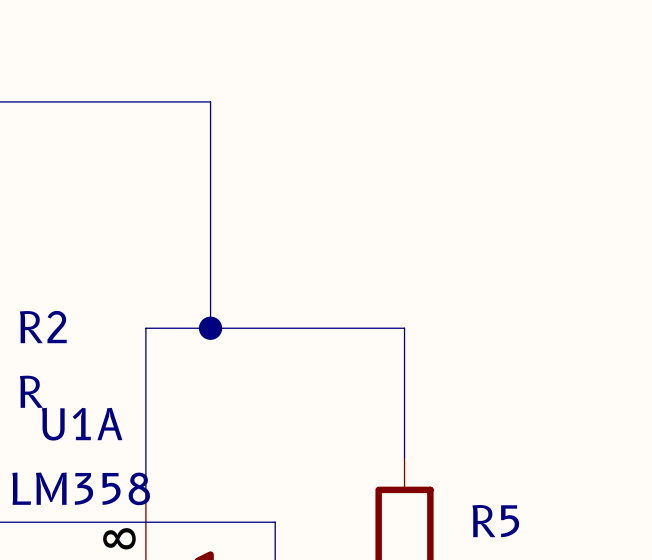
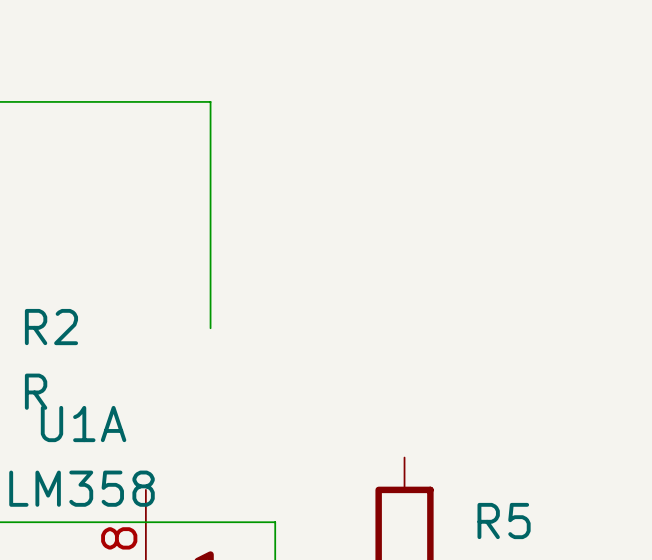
junction: (210, 328) -> none
wire: (404, 457) (404, 328) (145, 328) (145, 489) -> none

